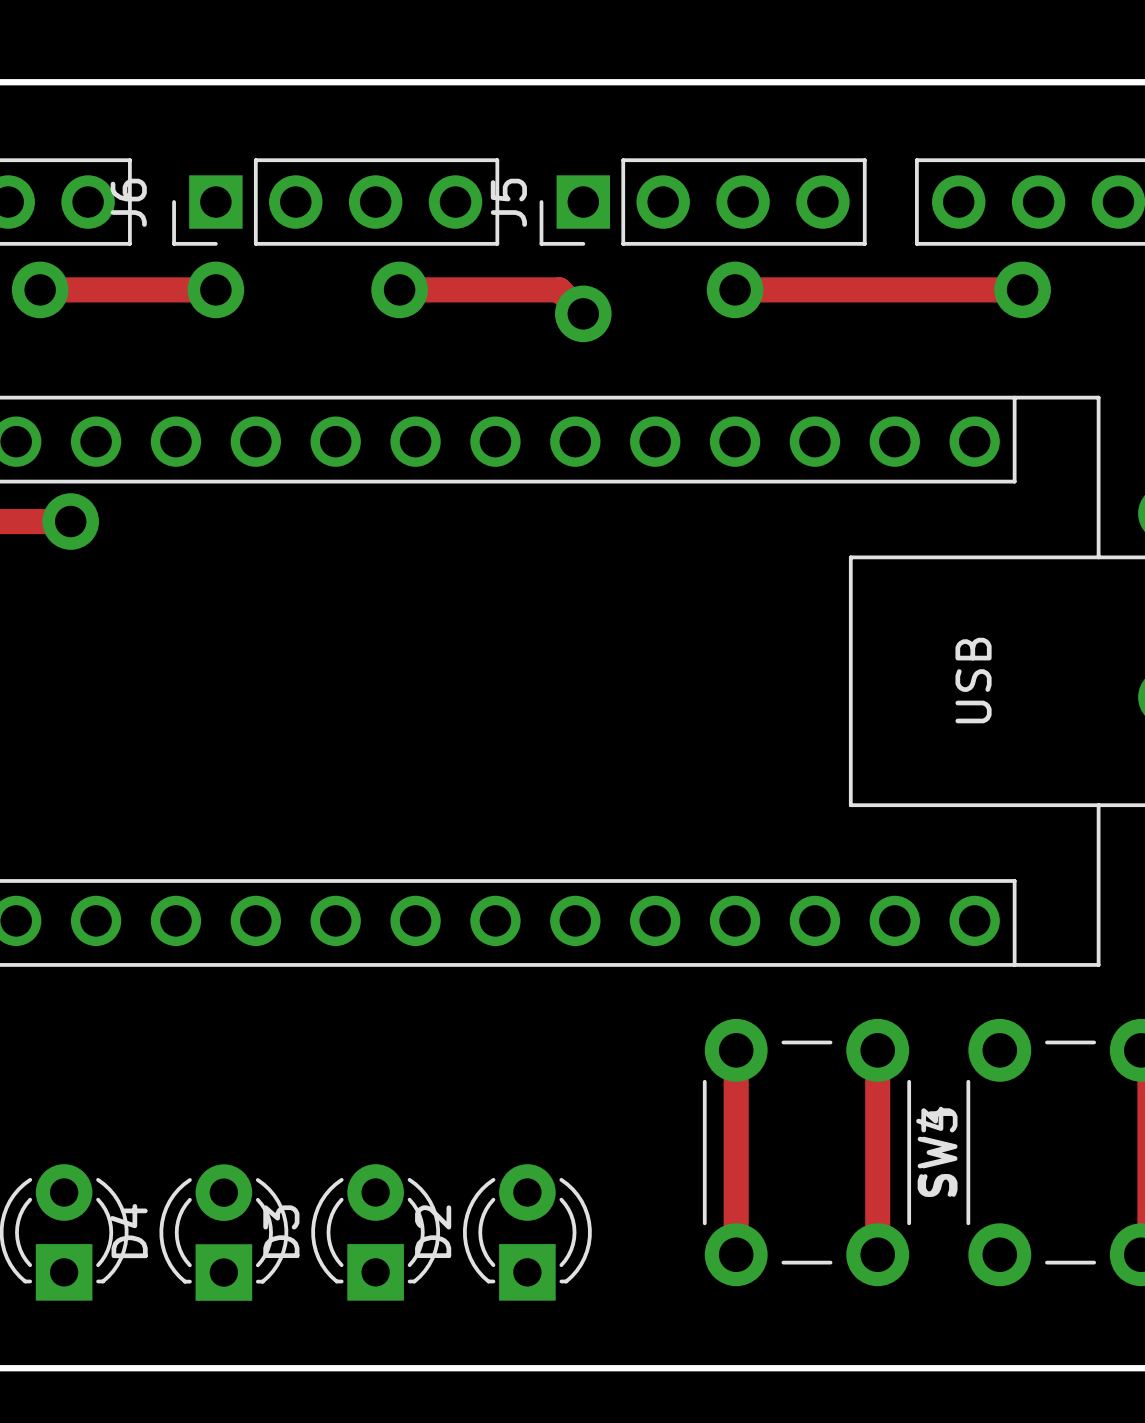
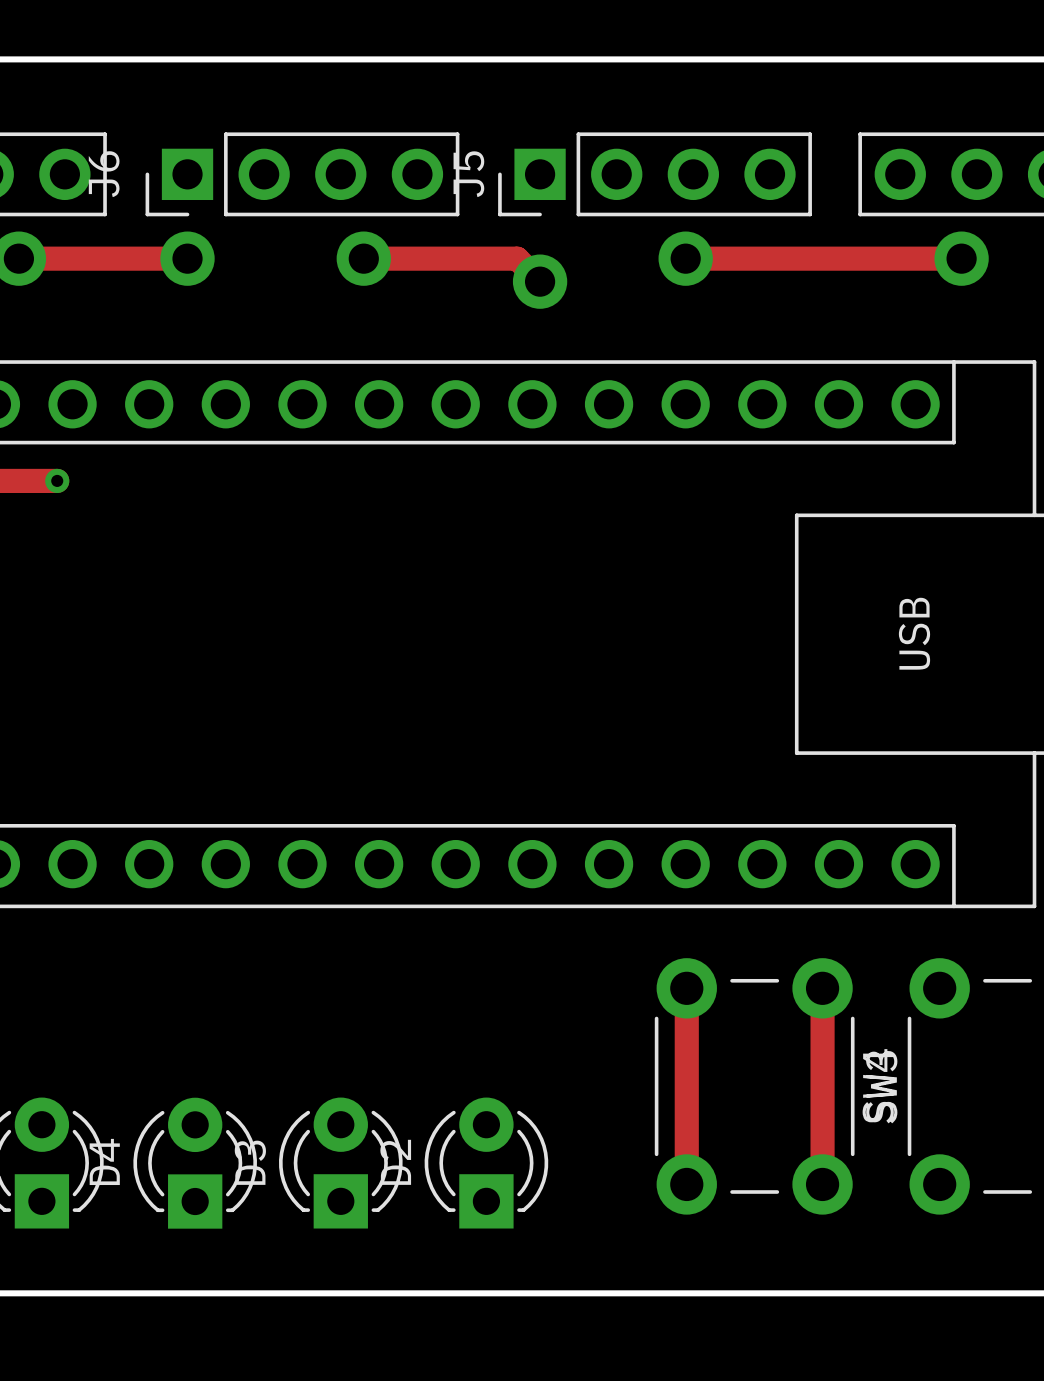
via size: [42, 493, 100, 550] -> [45, 468, 70, 493]

